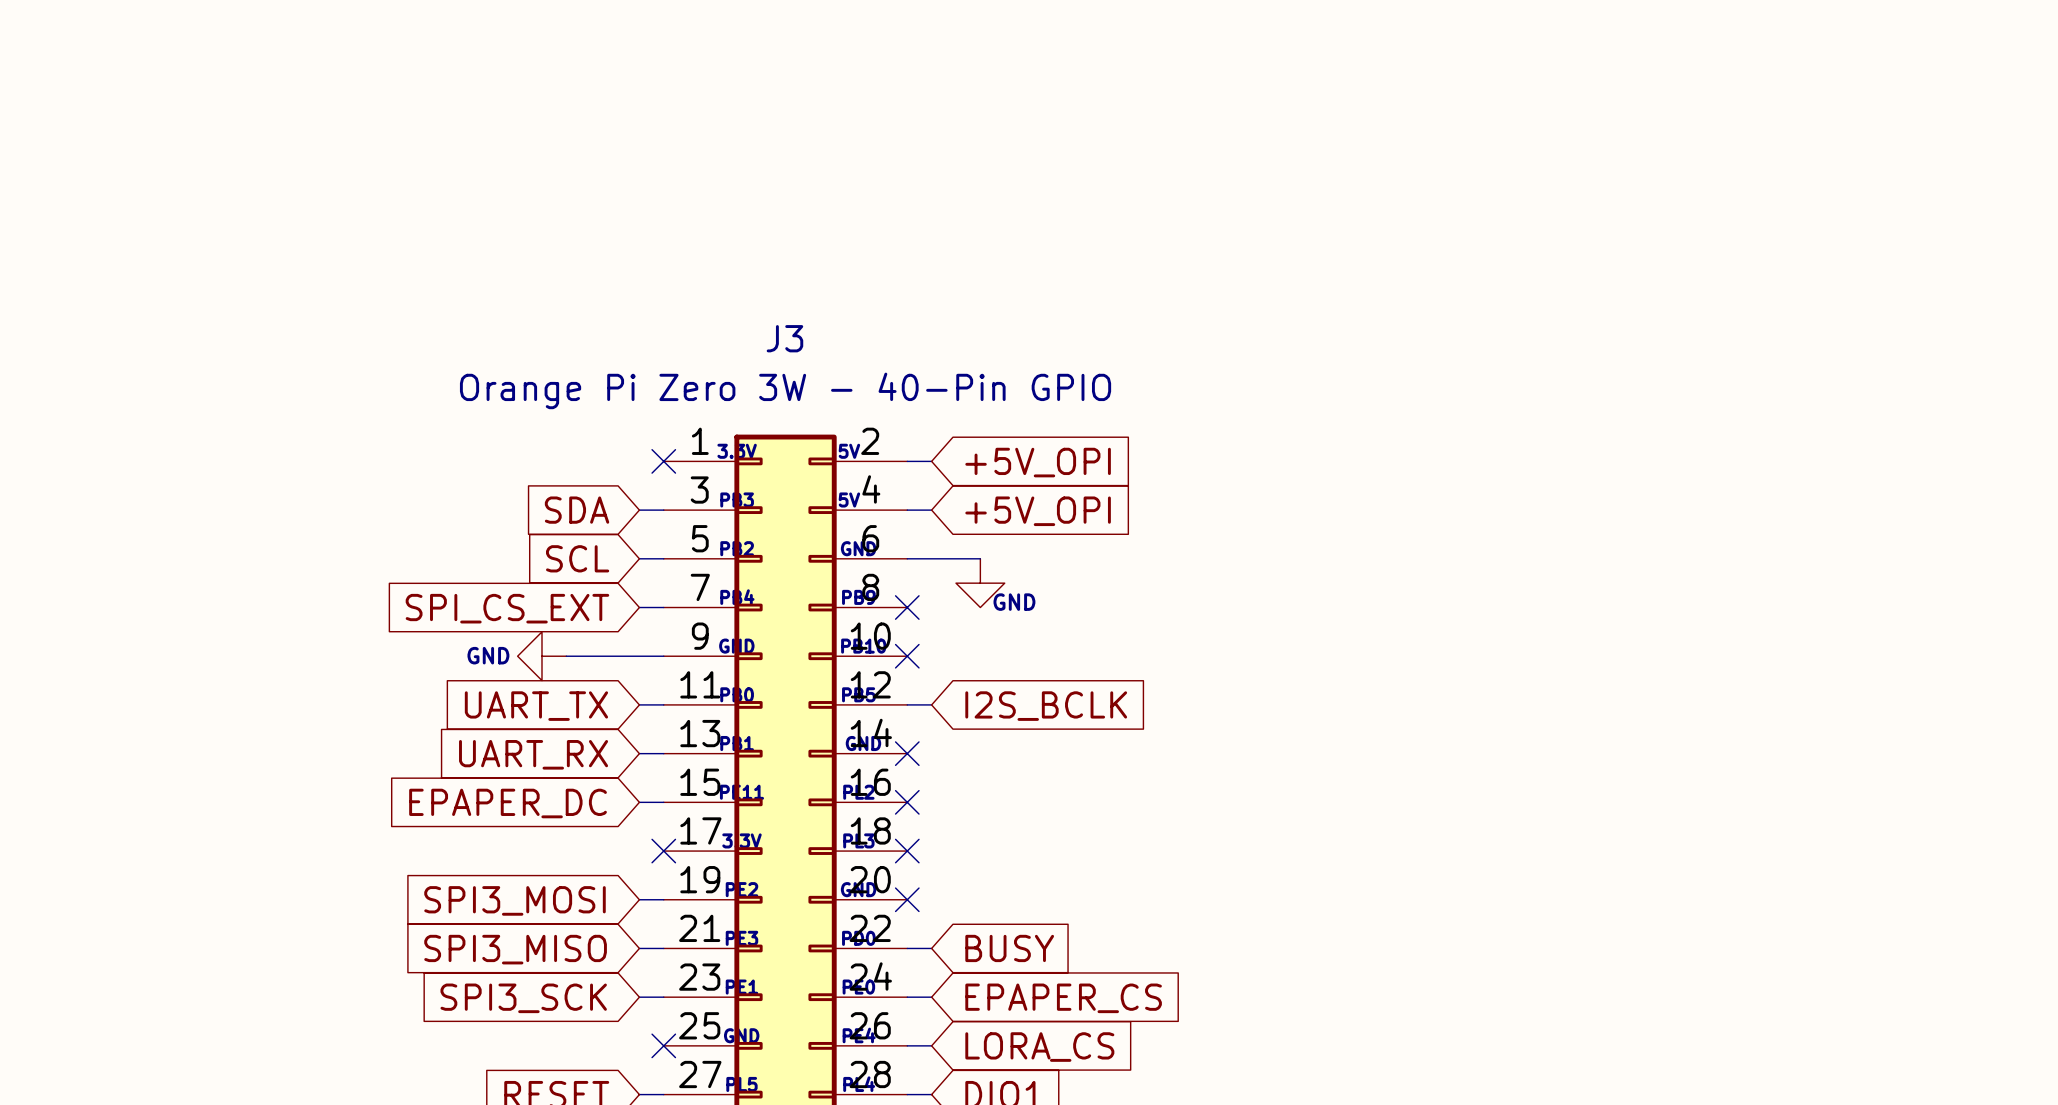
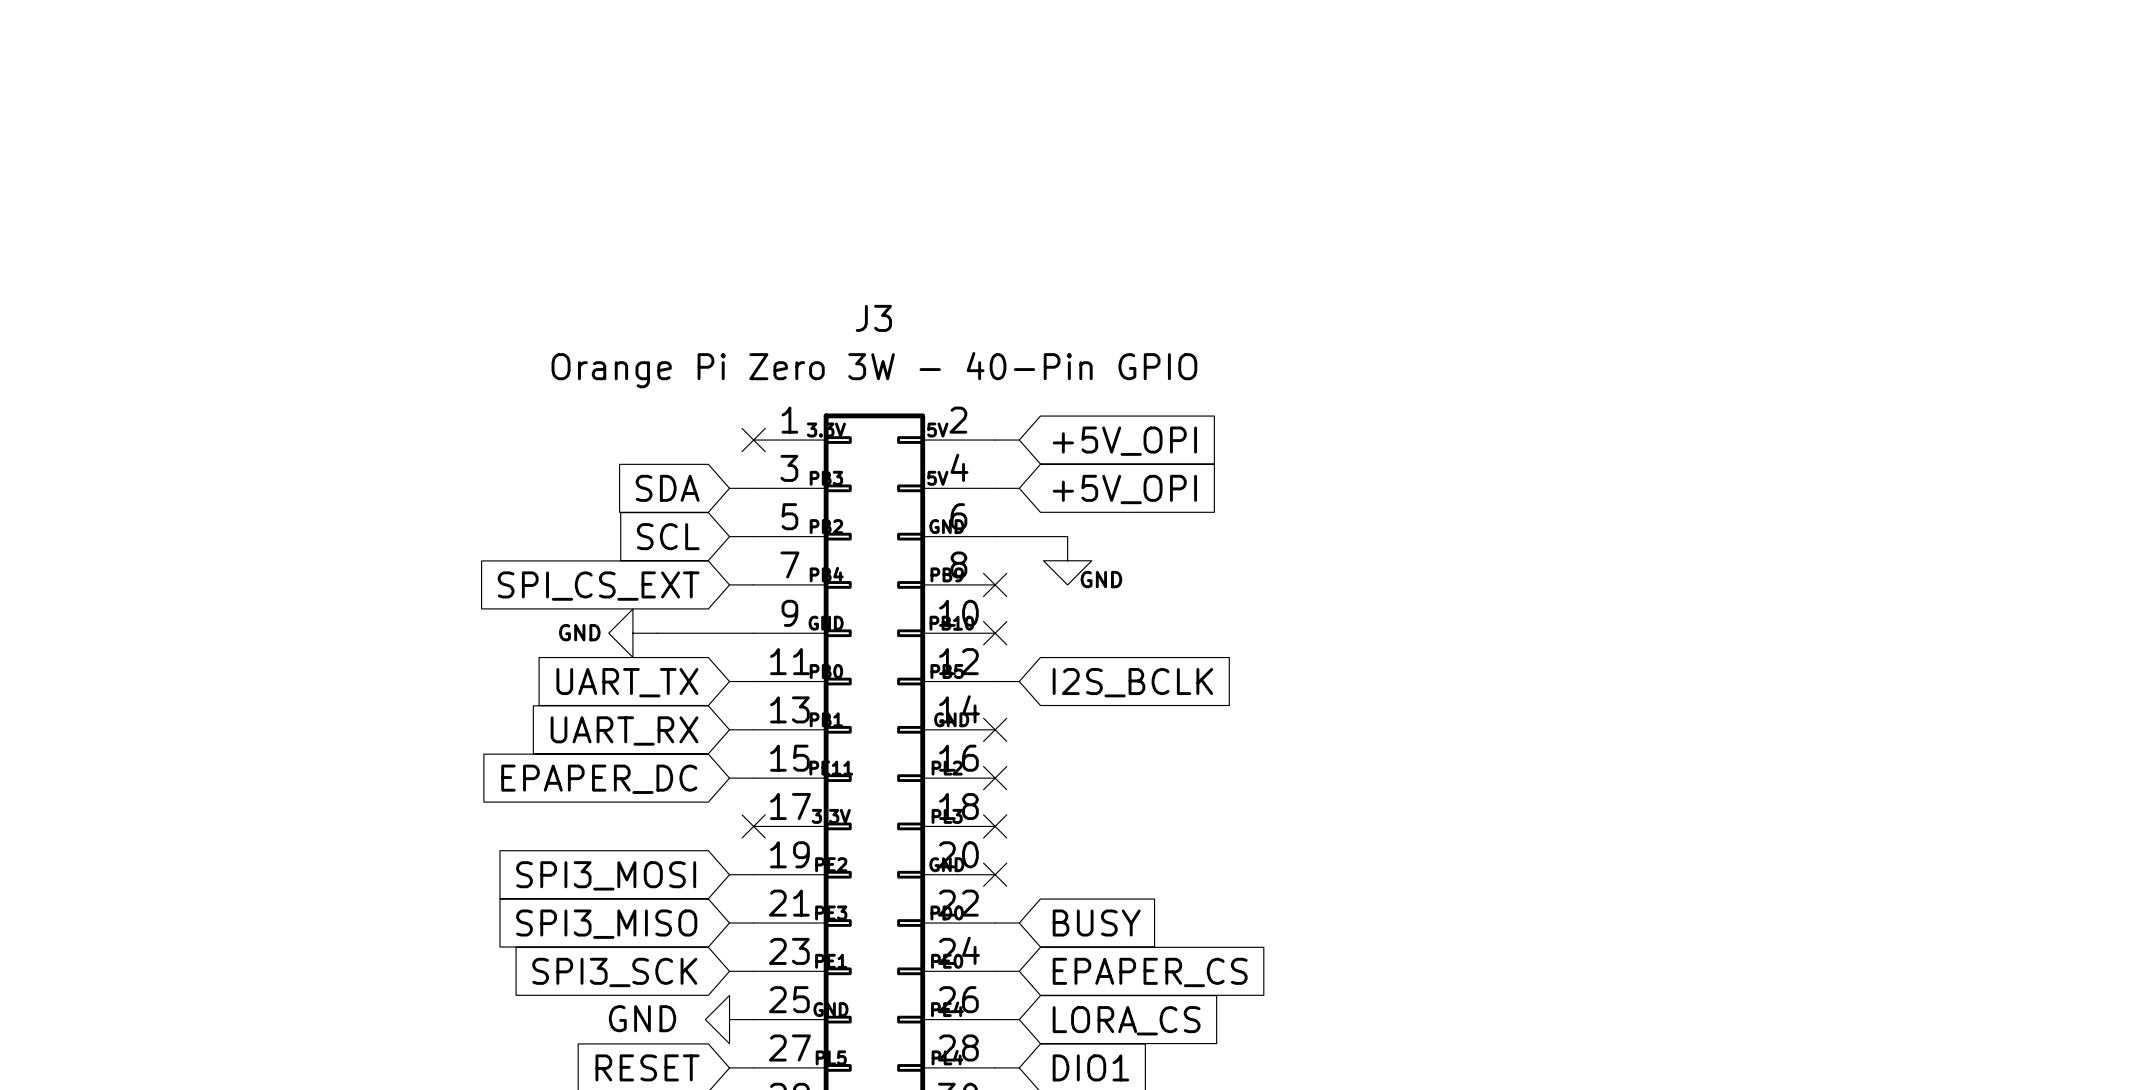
power symbol: none -> GND (729, 1019)
no-connect mark: (663, 1045) -> none

